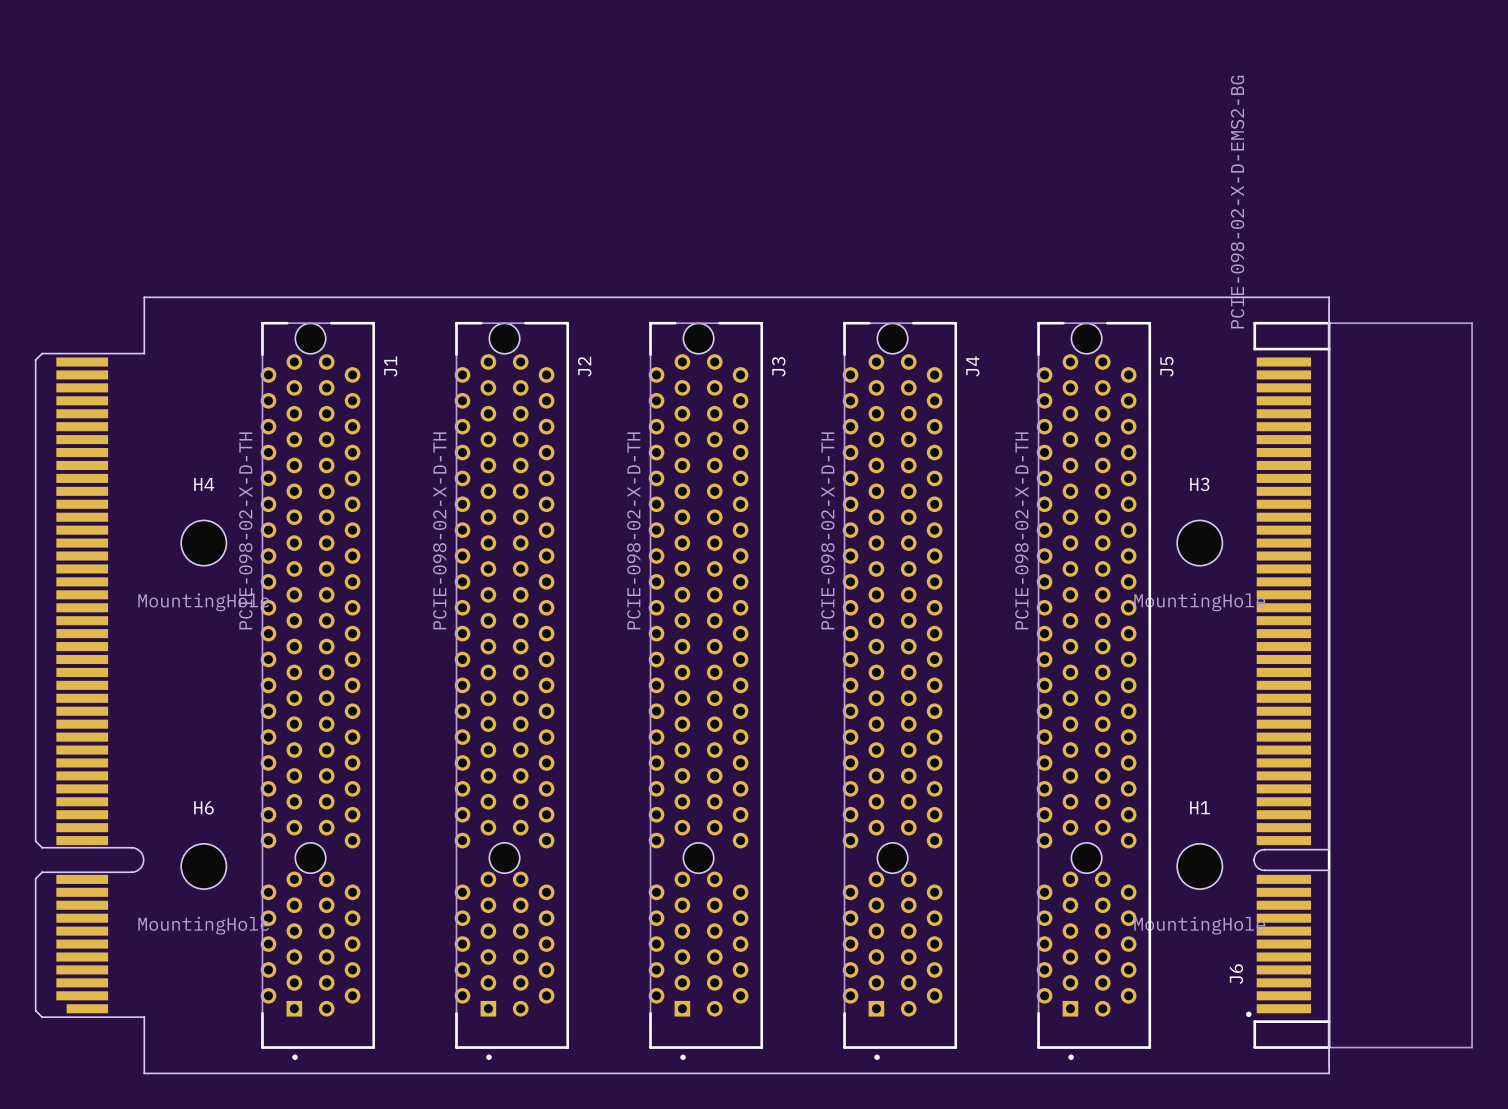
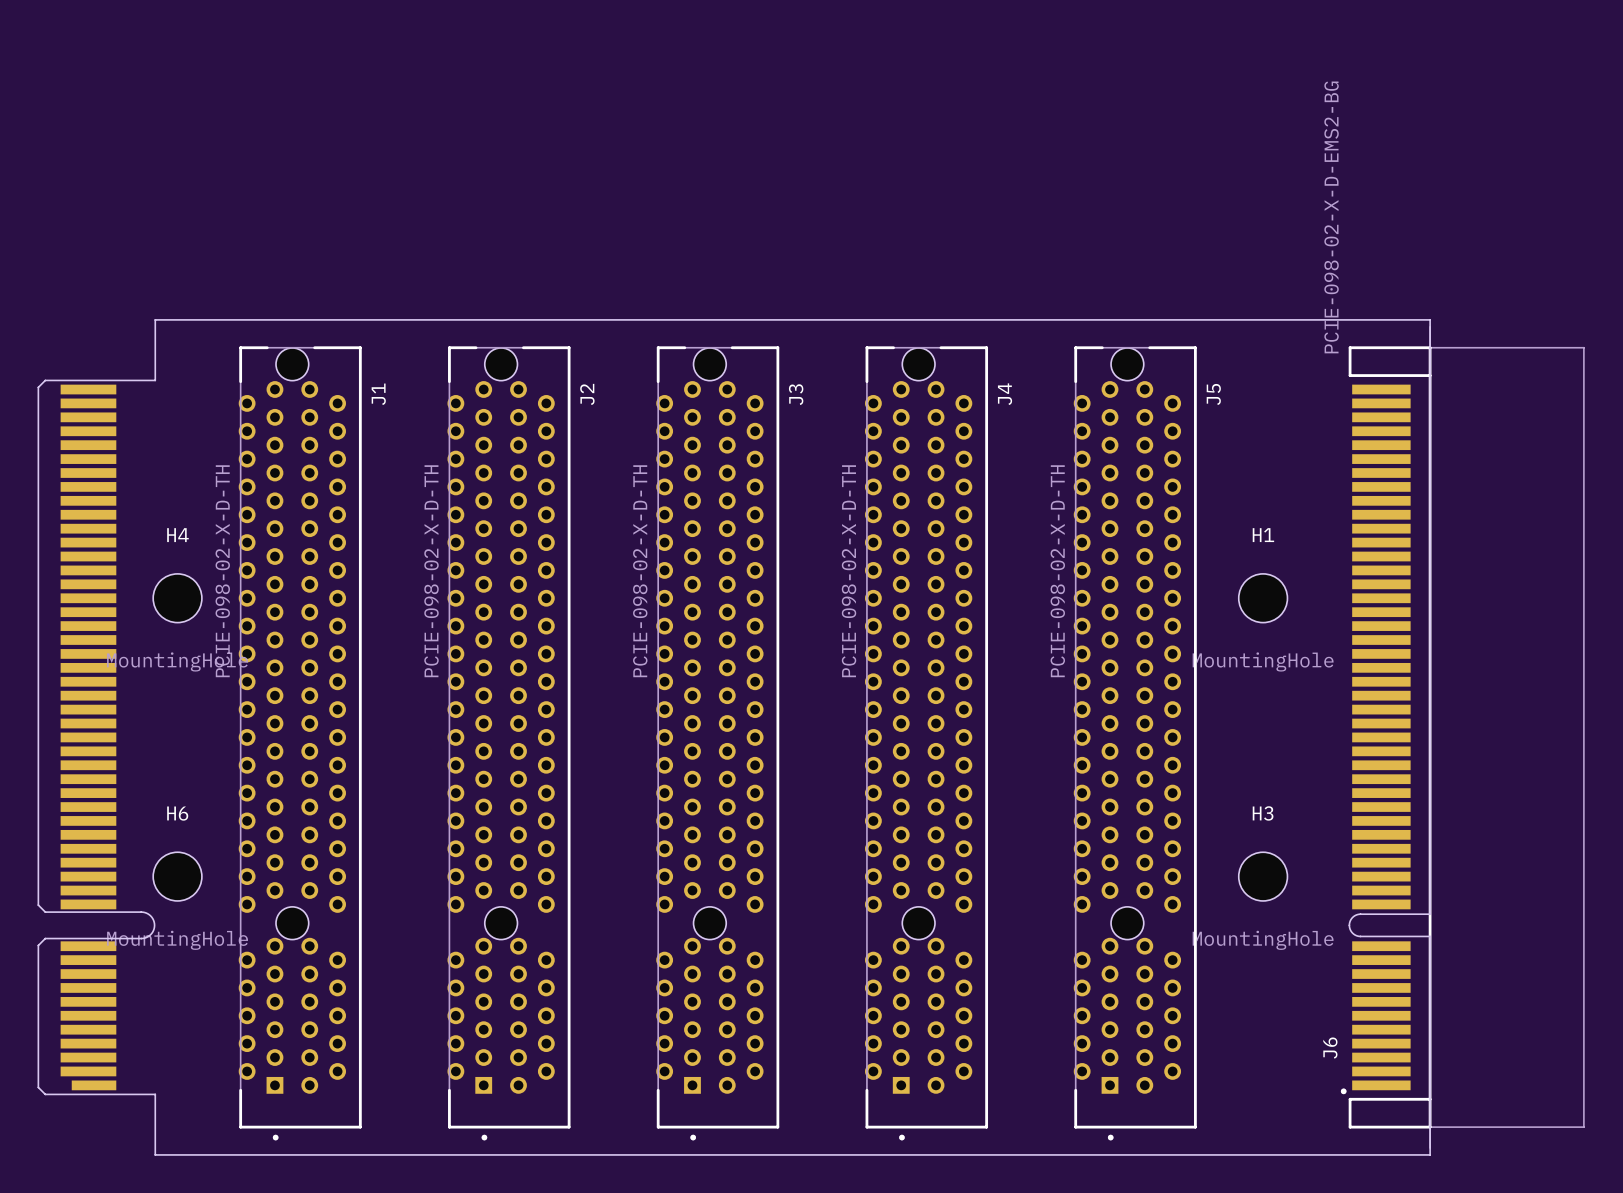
H4 position: (203, 543) -> (177, 598)
H3 position: (1199, 543) -> (1263, 876)
J1 position: (317, 690) -> (300, 743)
J2 position: (511, 690) -> (508, 743)
J3 position: (705, 690) -> (717, 743)
J4 position: (899, 690) -> (926, 743)
J5 position: (1093, 690) -> (1135, 743)
H6 position: (203, 866) -> (177, 876)
H1 position: (1199, 866) -> (1263, 598)

